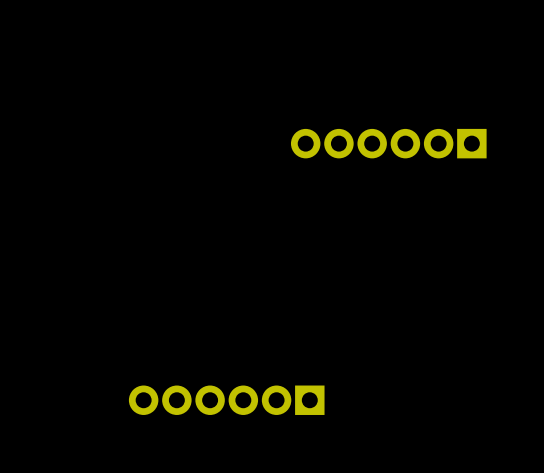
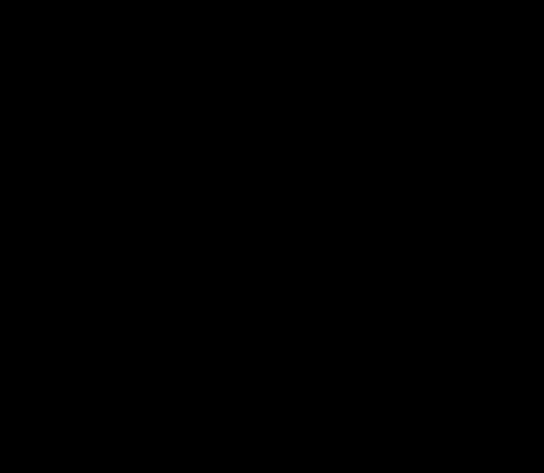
part: (388, 143) -> none
part: (226, 400) -> none

